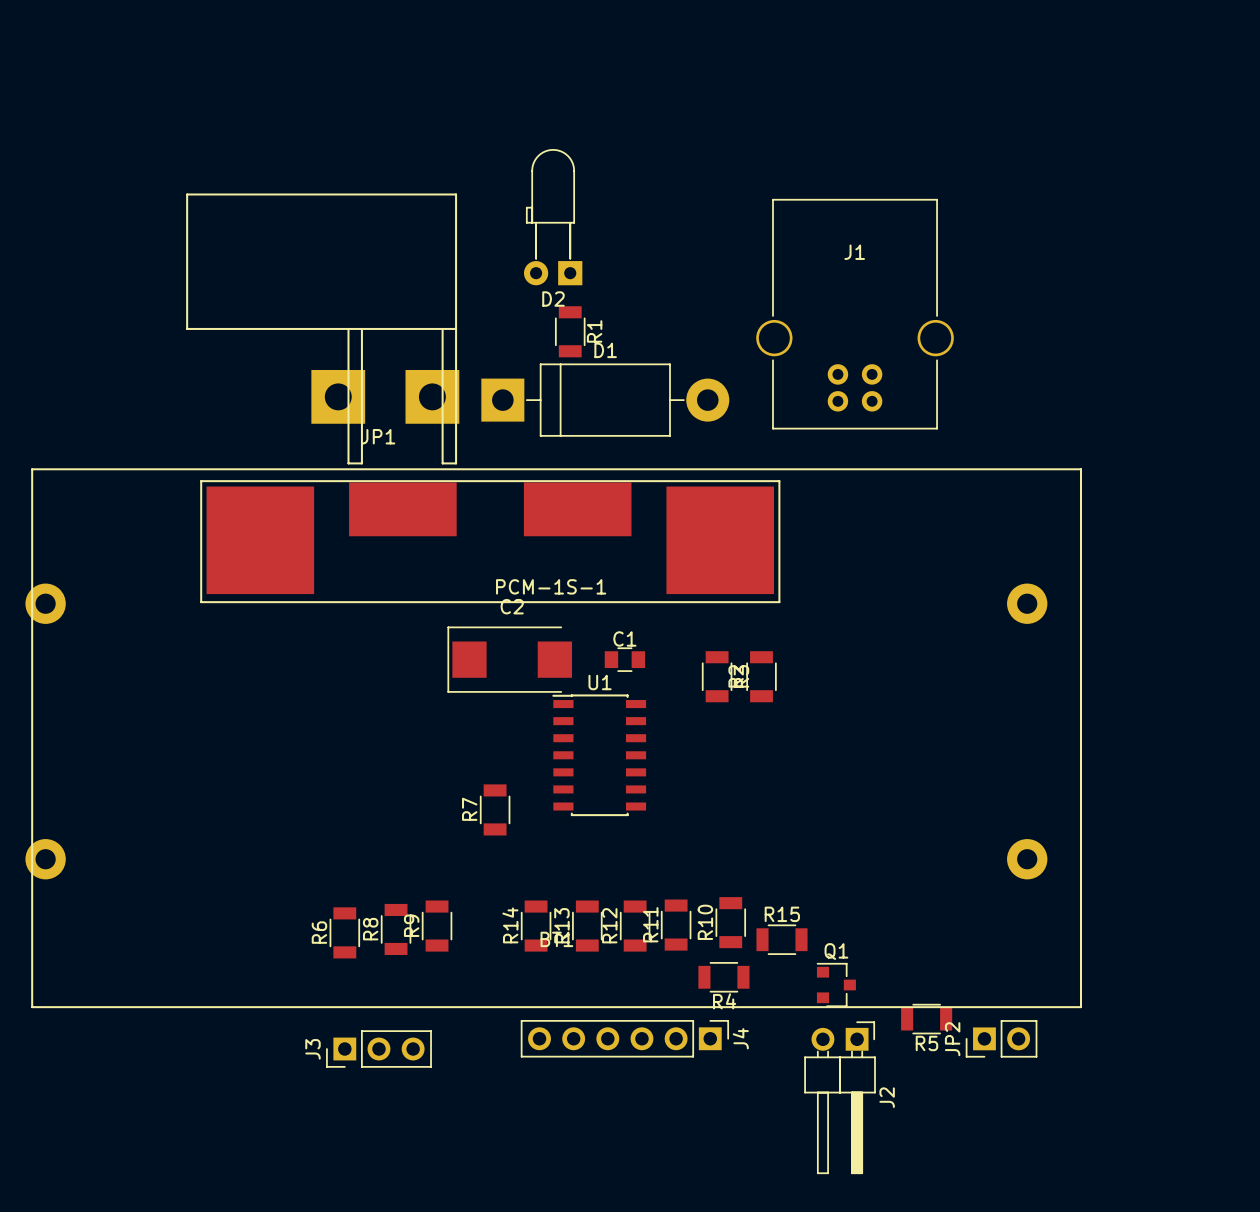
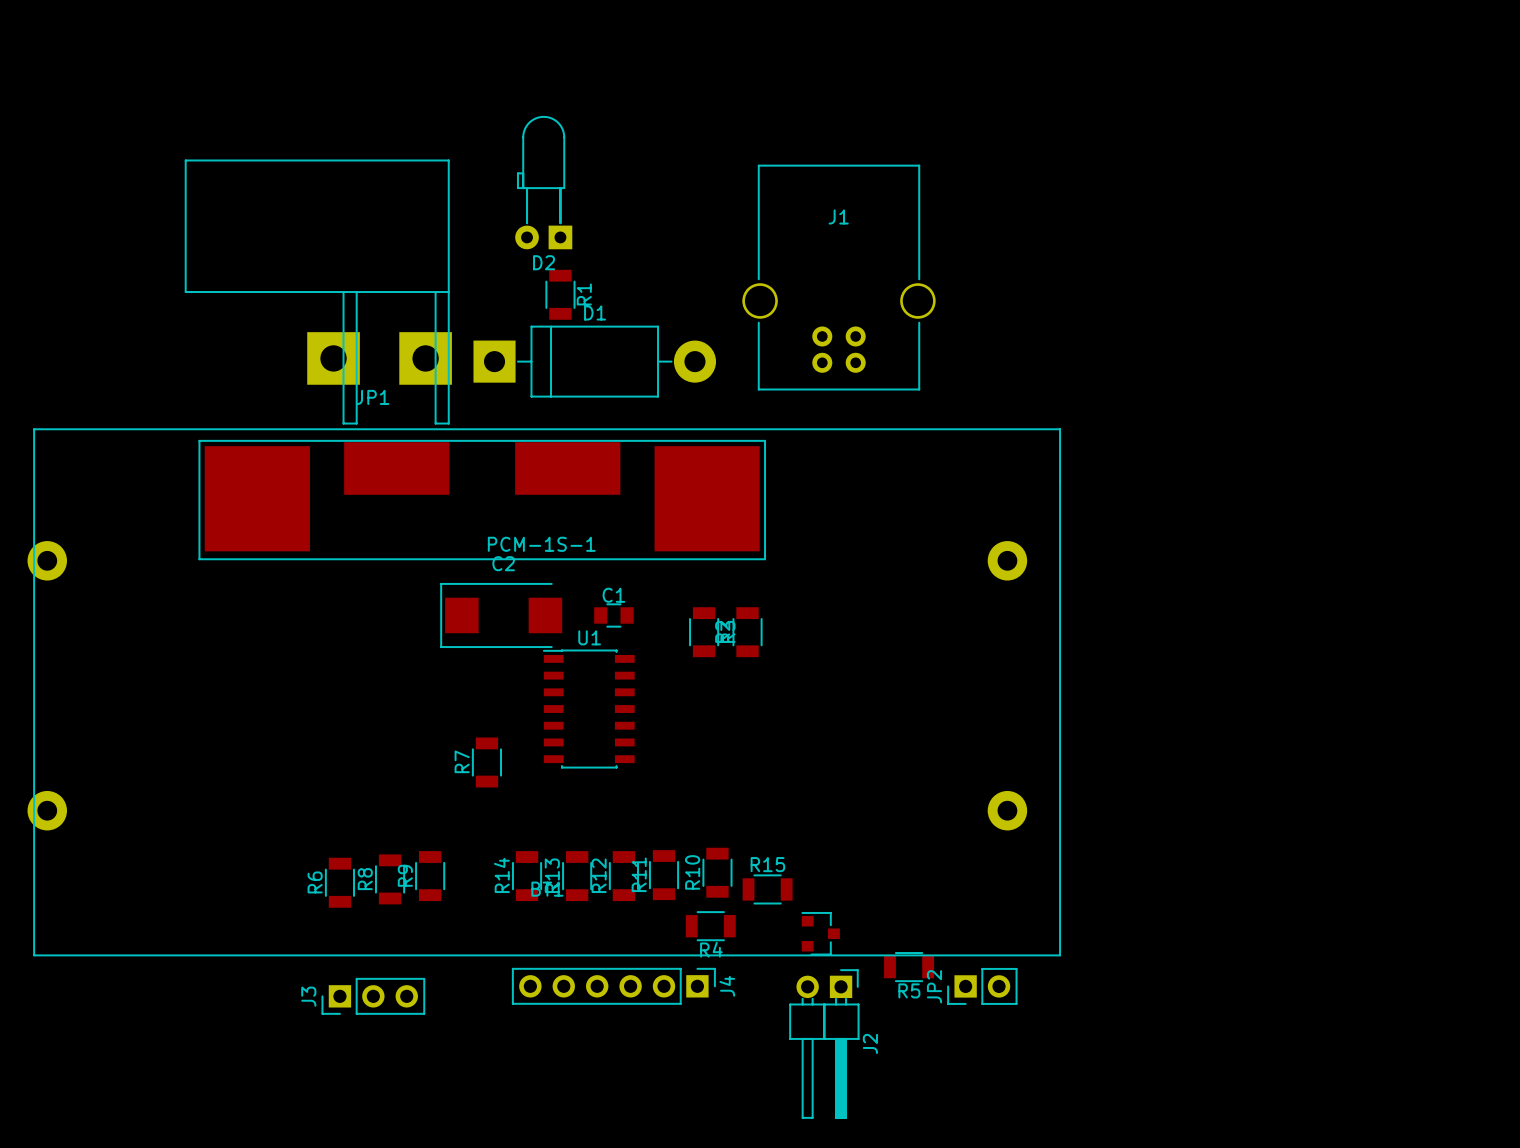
Q1 name: Q1 (836, 951) -> none

